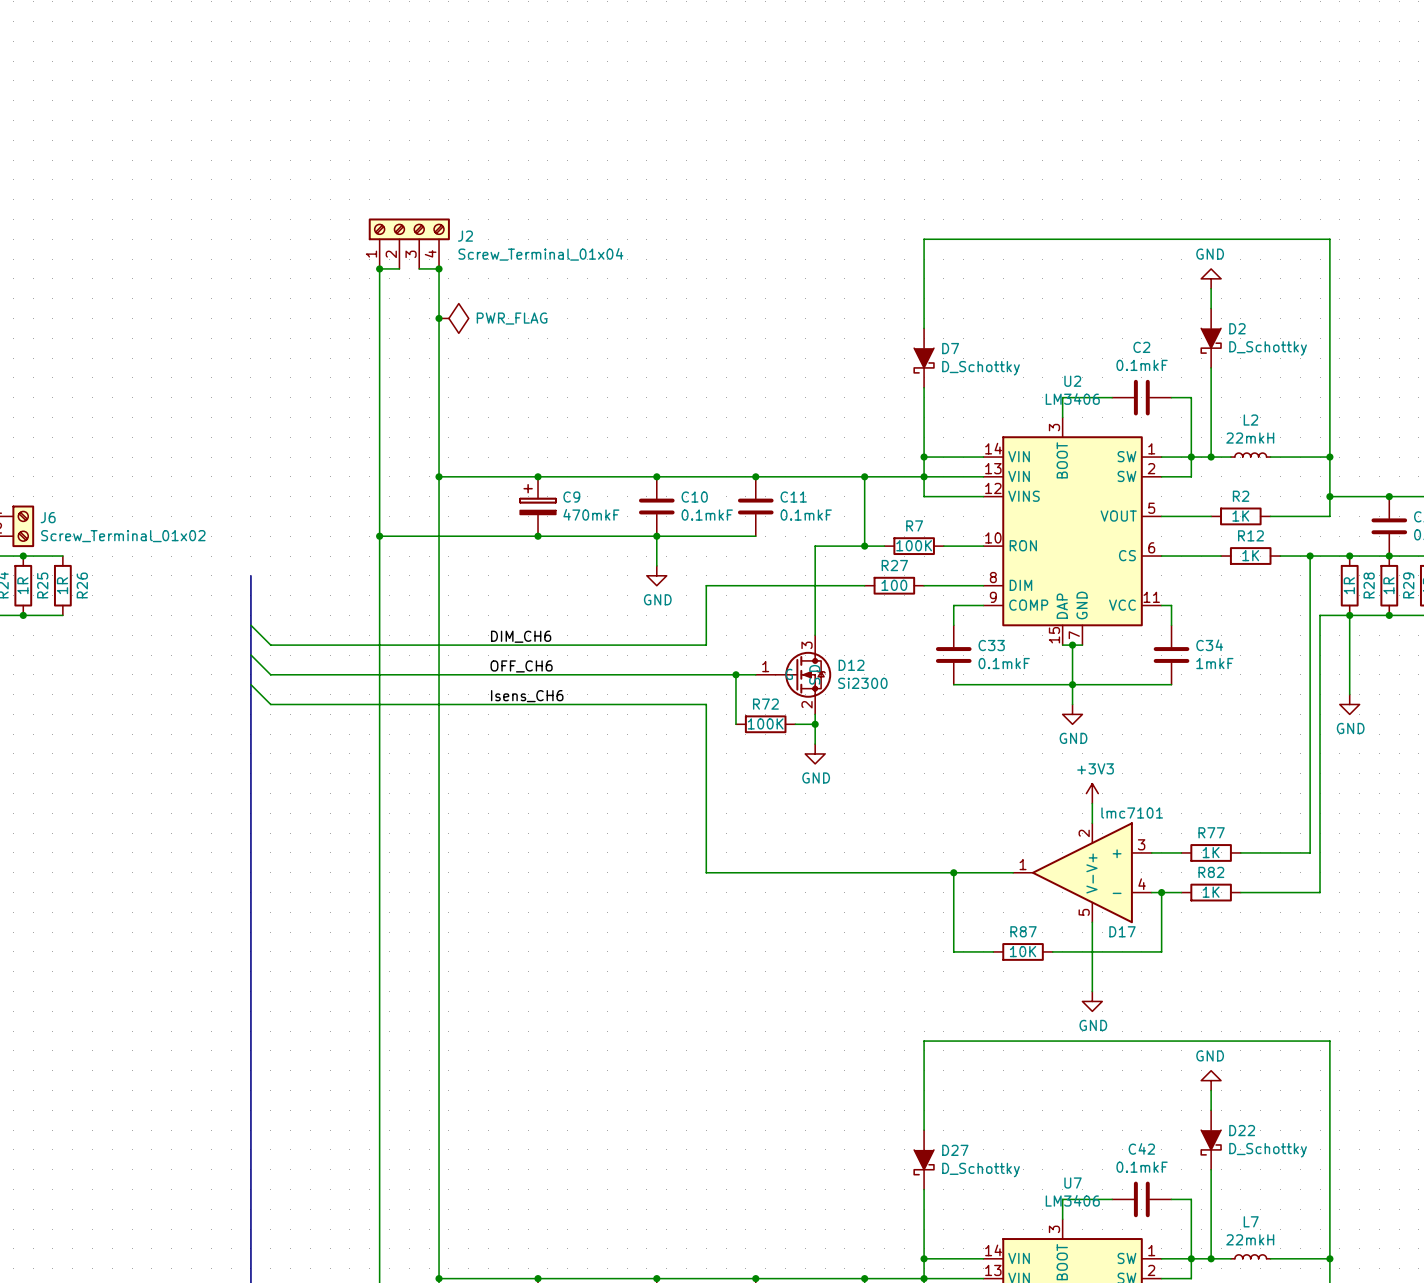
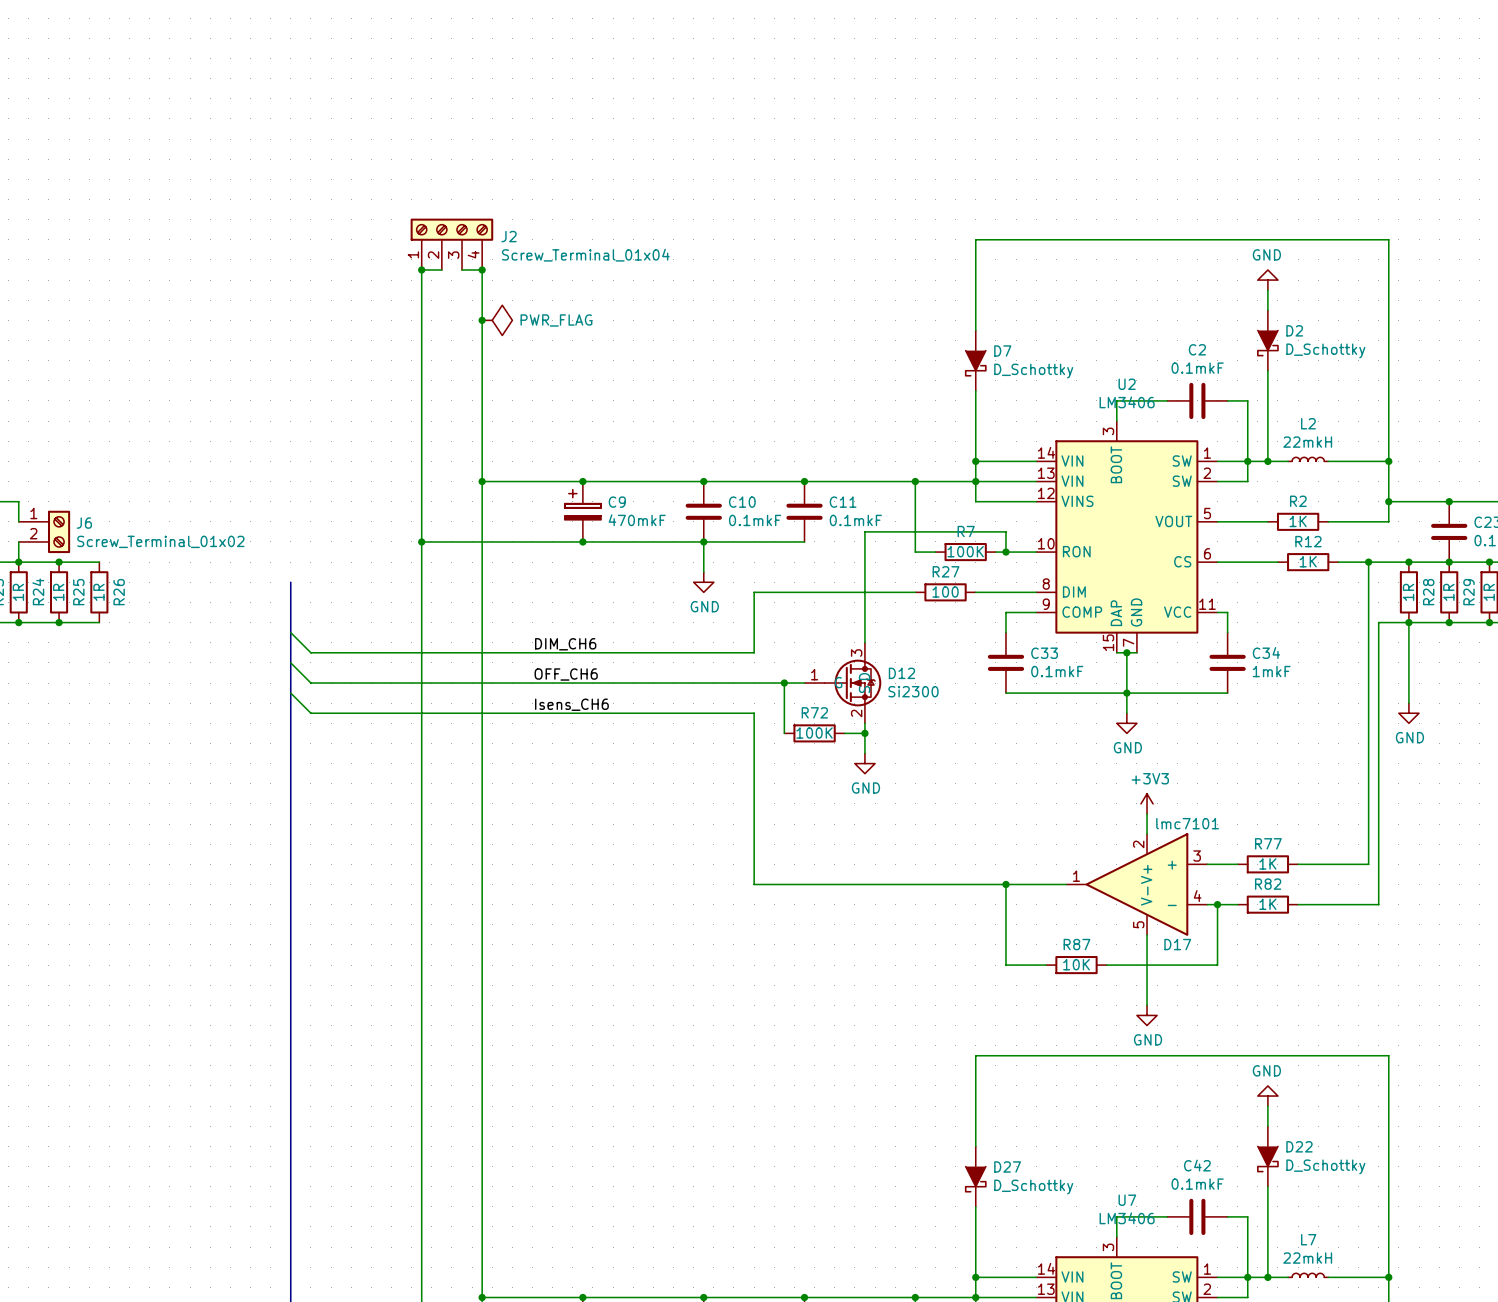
wire: (815, 546) (864, 546) -> (864, 552) (864, 531) (1005, 531) (1005, 552)
junction: (864, 546) -> none
junction: none -> (1005, 552)

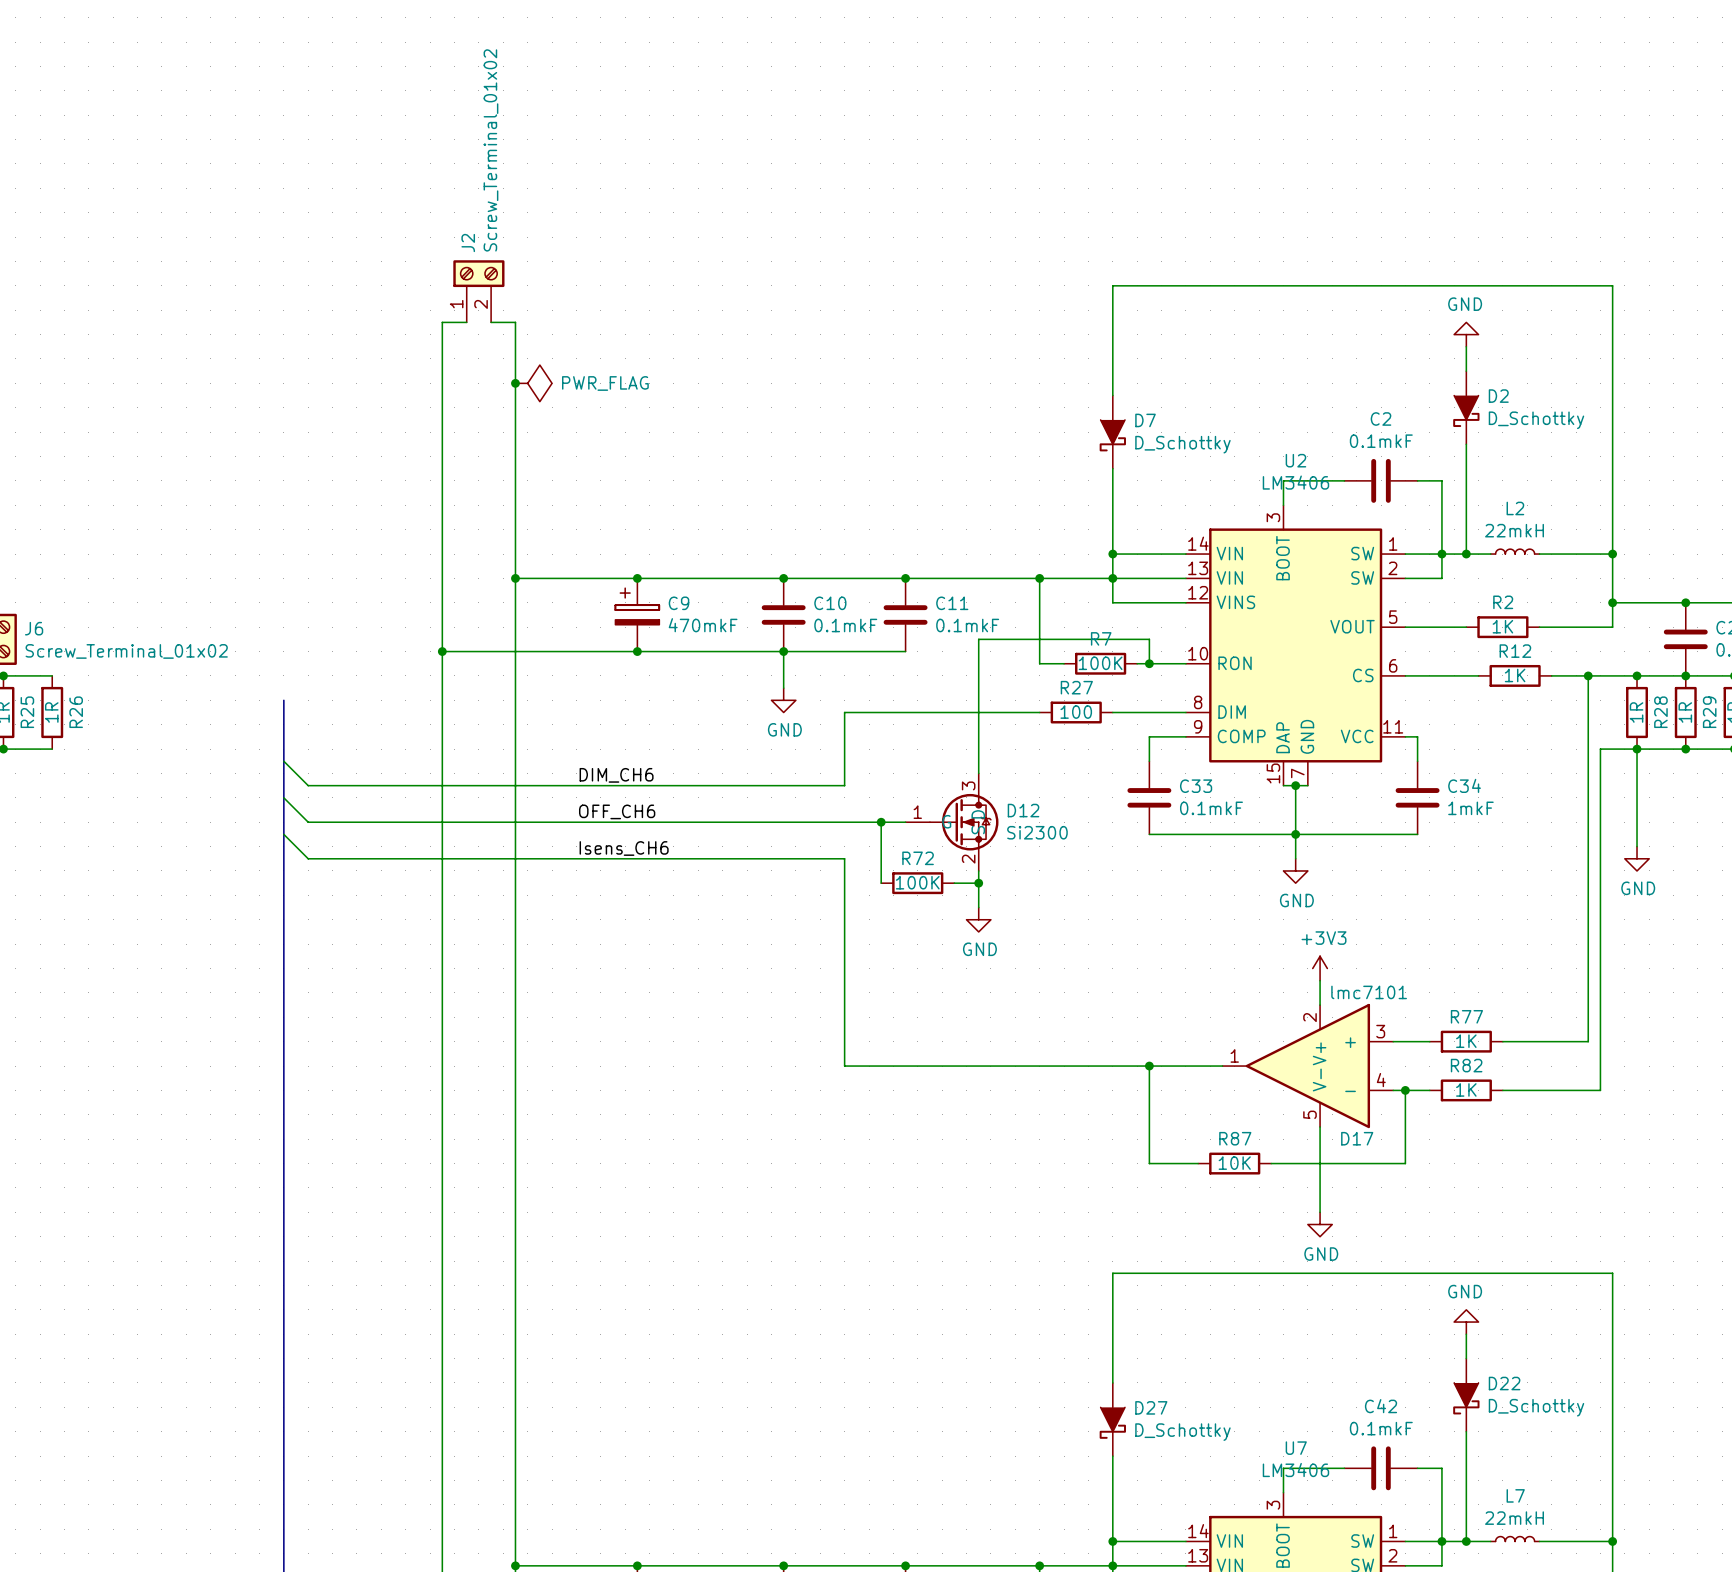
J2 symbol: [410, 218, 494, 270] -> [453, 260, 505, 323]
J2 name position: J2 (509, 236) -> J2 (468, 243)
J2 value: Screw_Terminal_01x04 (585, 255) -> Screw_Terminal_01x02 (490, 150)
junction: (421, 269) -> none
junction: (482, 269) -> none

